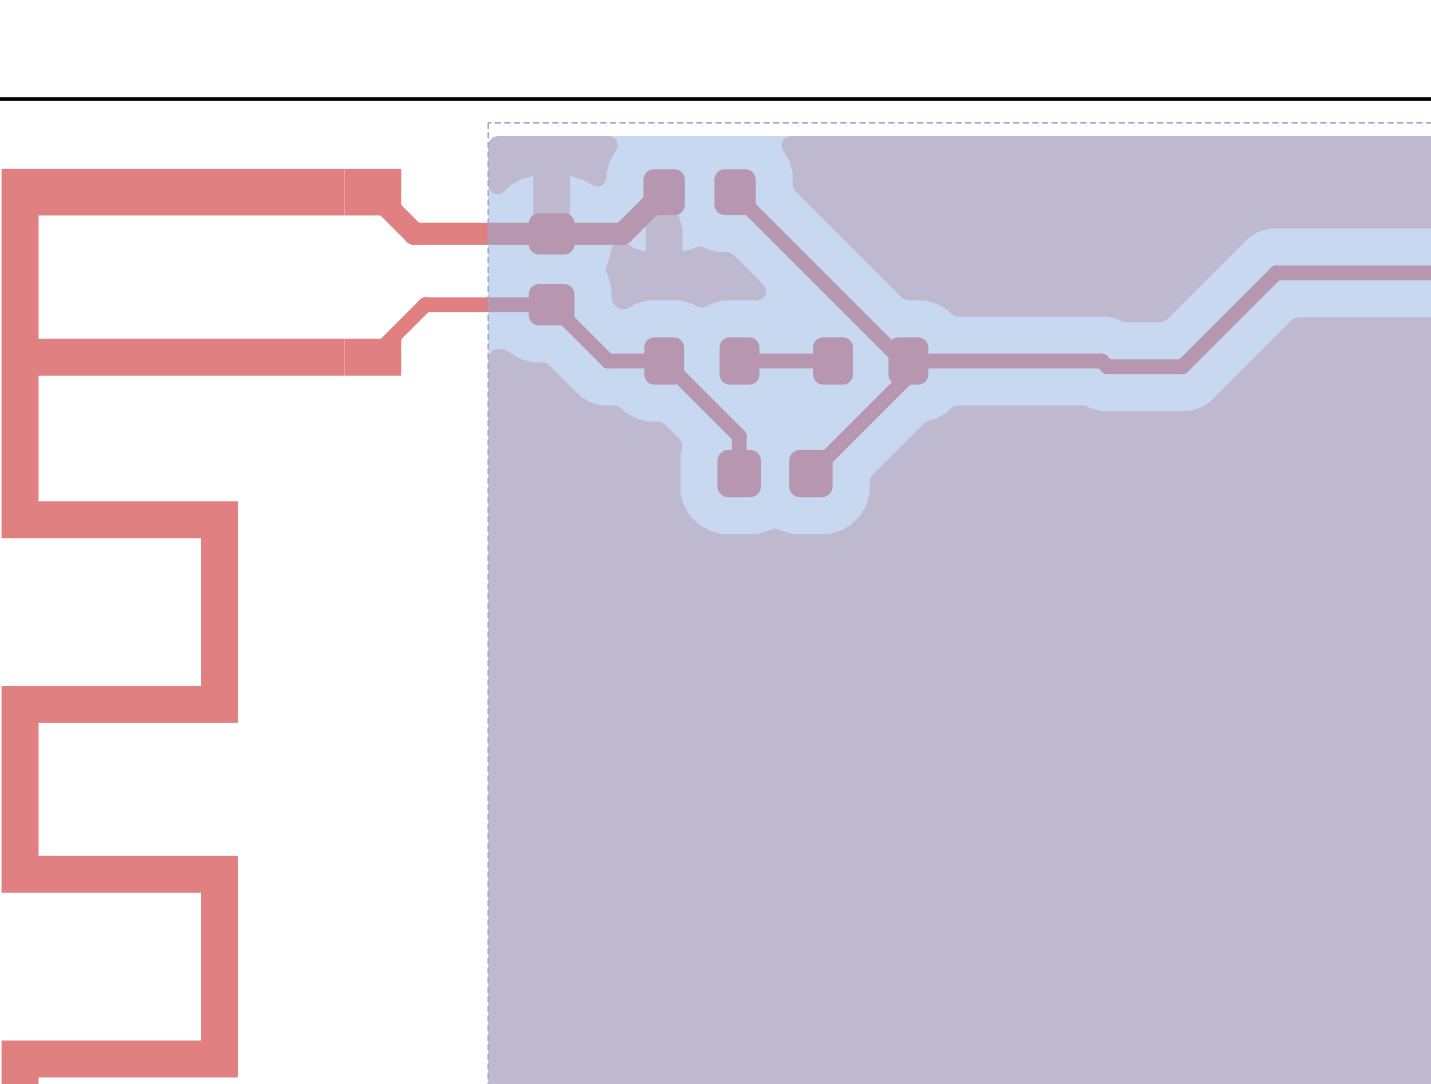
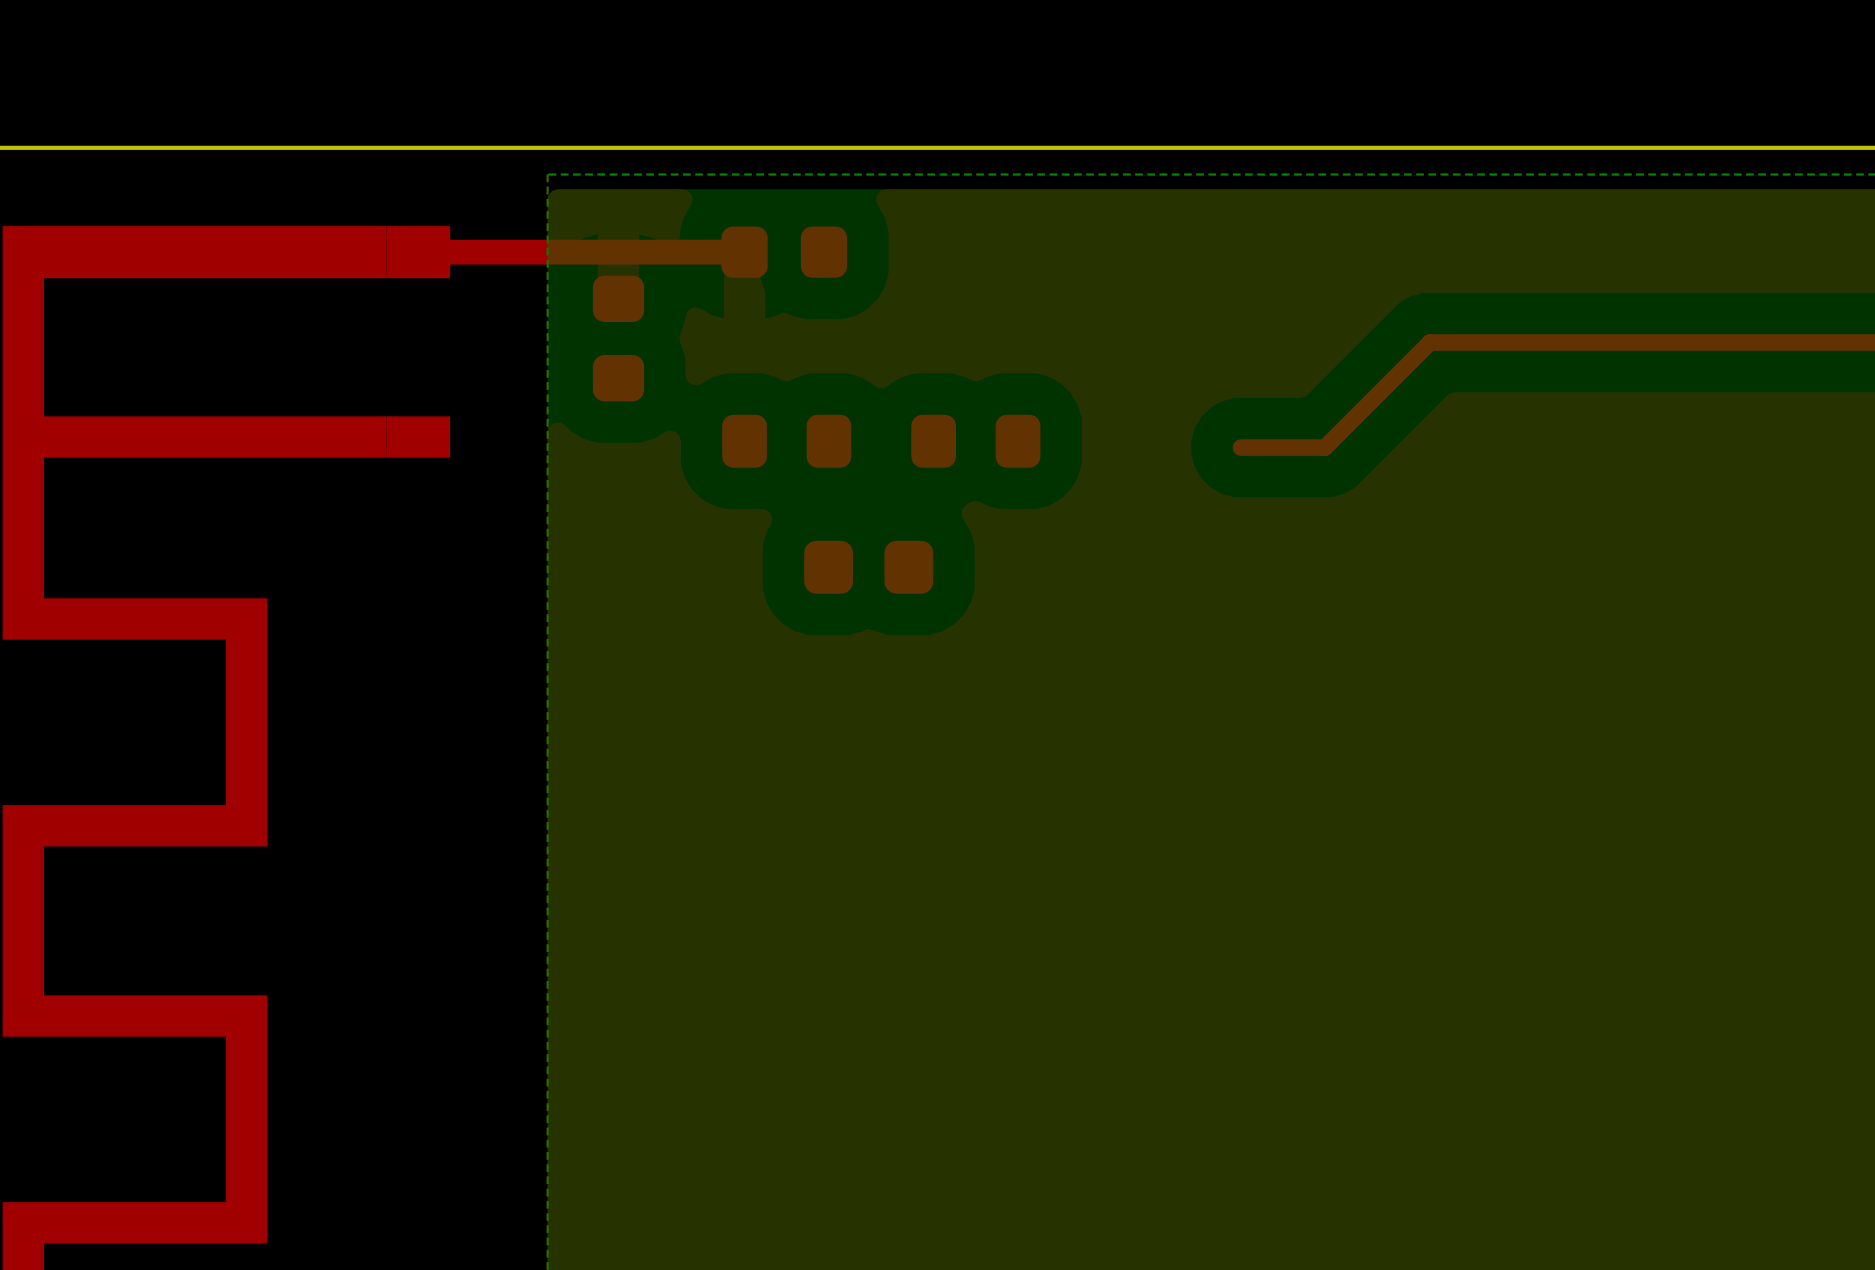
top track: (664, 192) (622, 233) (414, 233) (372, 192) -> (744, 252) (418, 252)
top track: (735, 192) (902, 361) (1101, 361) (1107, 366) -> none
top track: (372, 357) (425, 304) (551, 304) (607, 361) (664, 361) (739, 436) (739, 473) -> none
top track: (833, 361) (739, 361) -> none
top track: (908, 361) (908, 376) (810, 473) -> none

